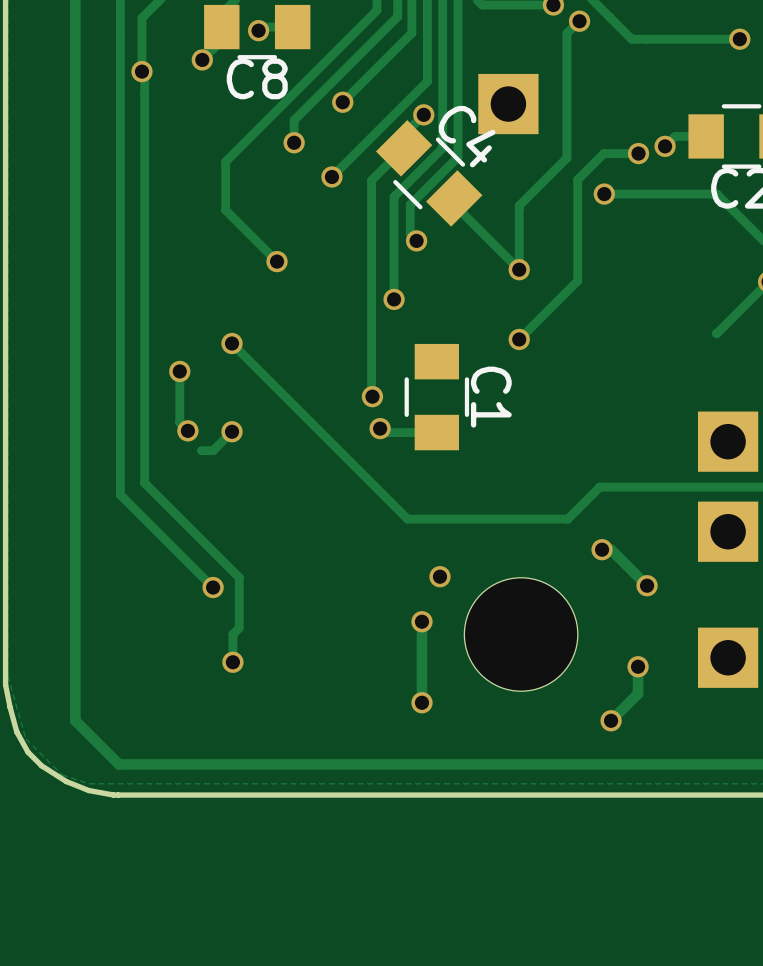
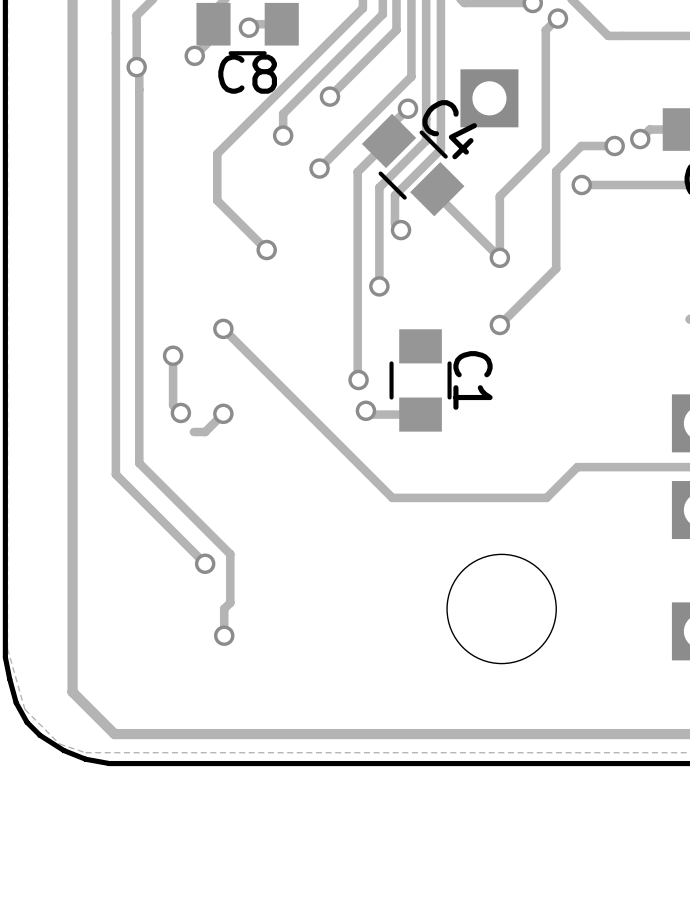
track: (602, 549) (611, 549) (647, 585) -> none
via: (602, 549) -> none
via: (439, 576) -> none
via: (647, 585) -> none
track: (421, 621) (421, 702) -> none
via: (421, 621) -> none
track: (638, 666) (638, 693) (611, 720) -> none
via: (638, 666) -> none
via: (421, 702) -> none
via: (611, 720) -> none

